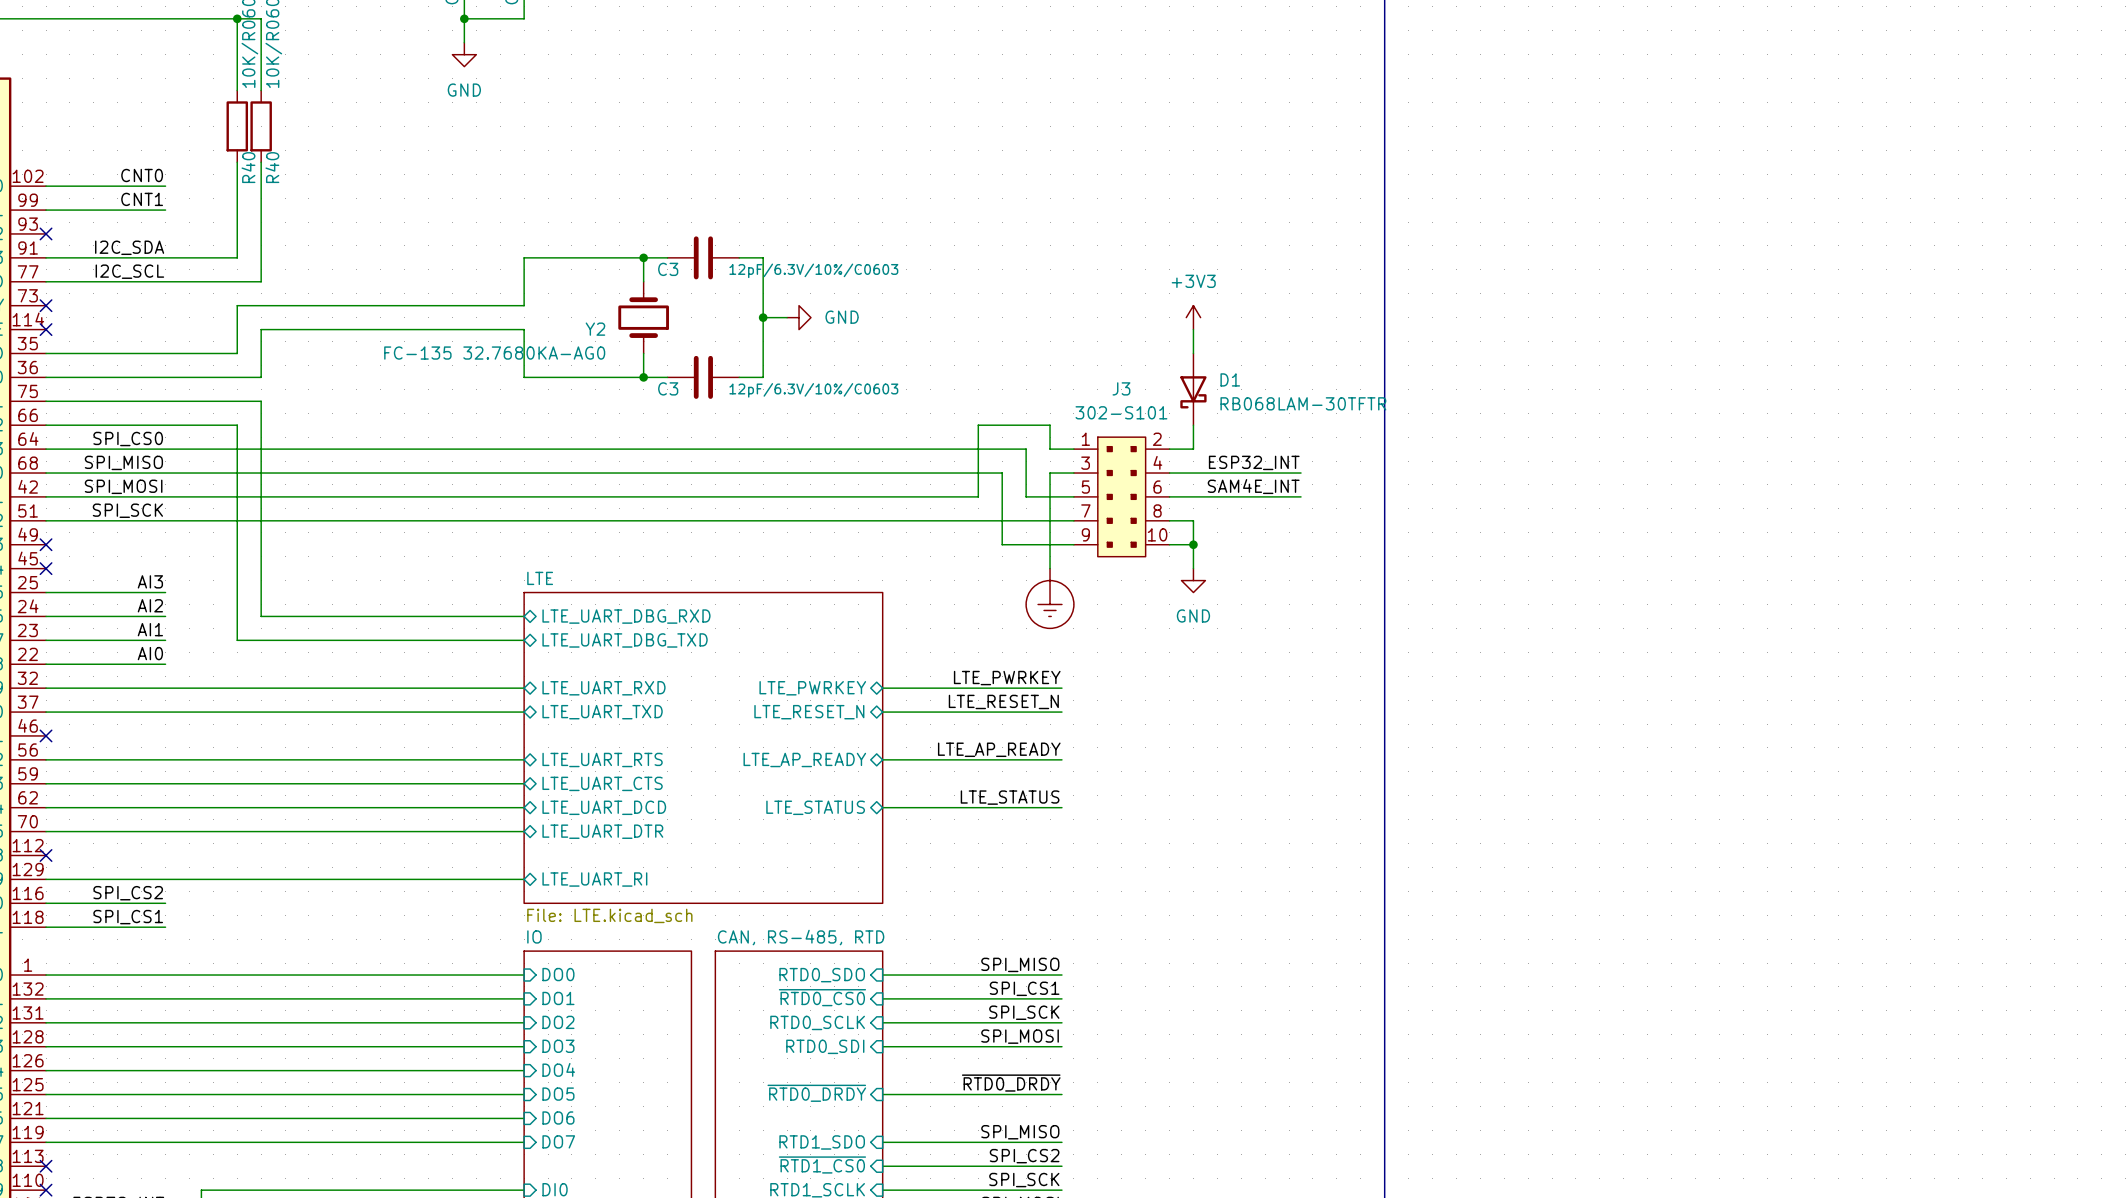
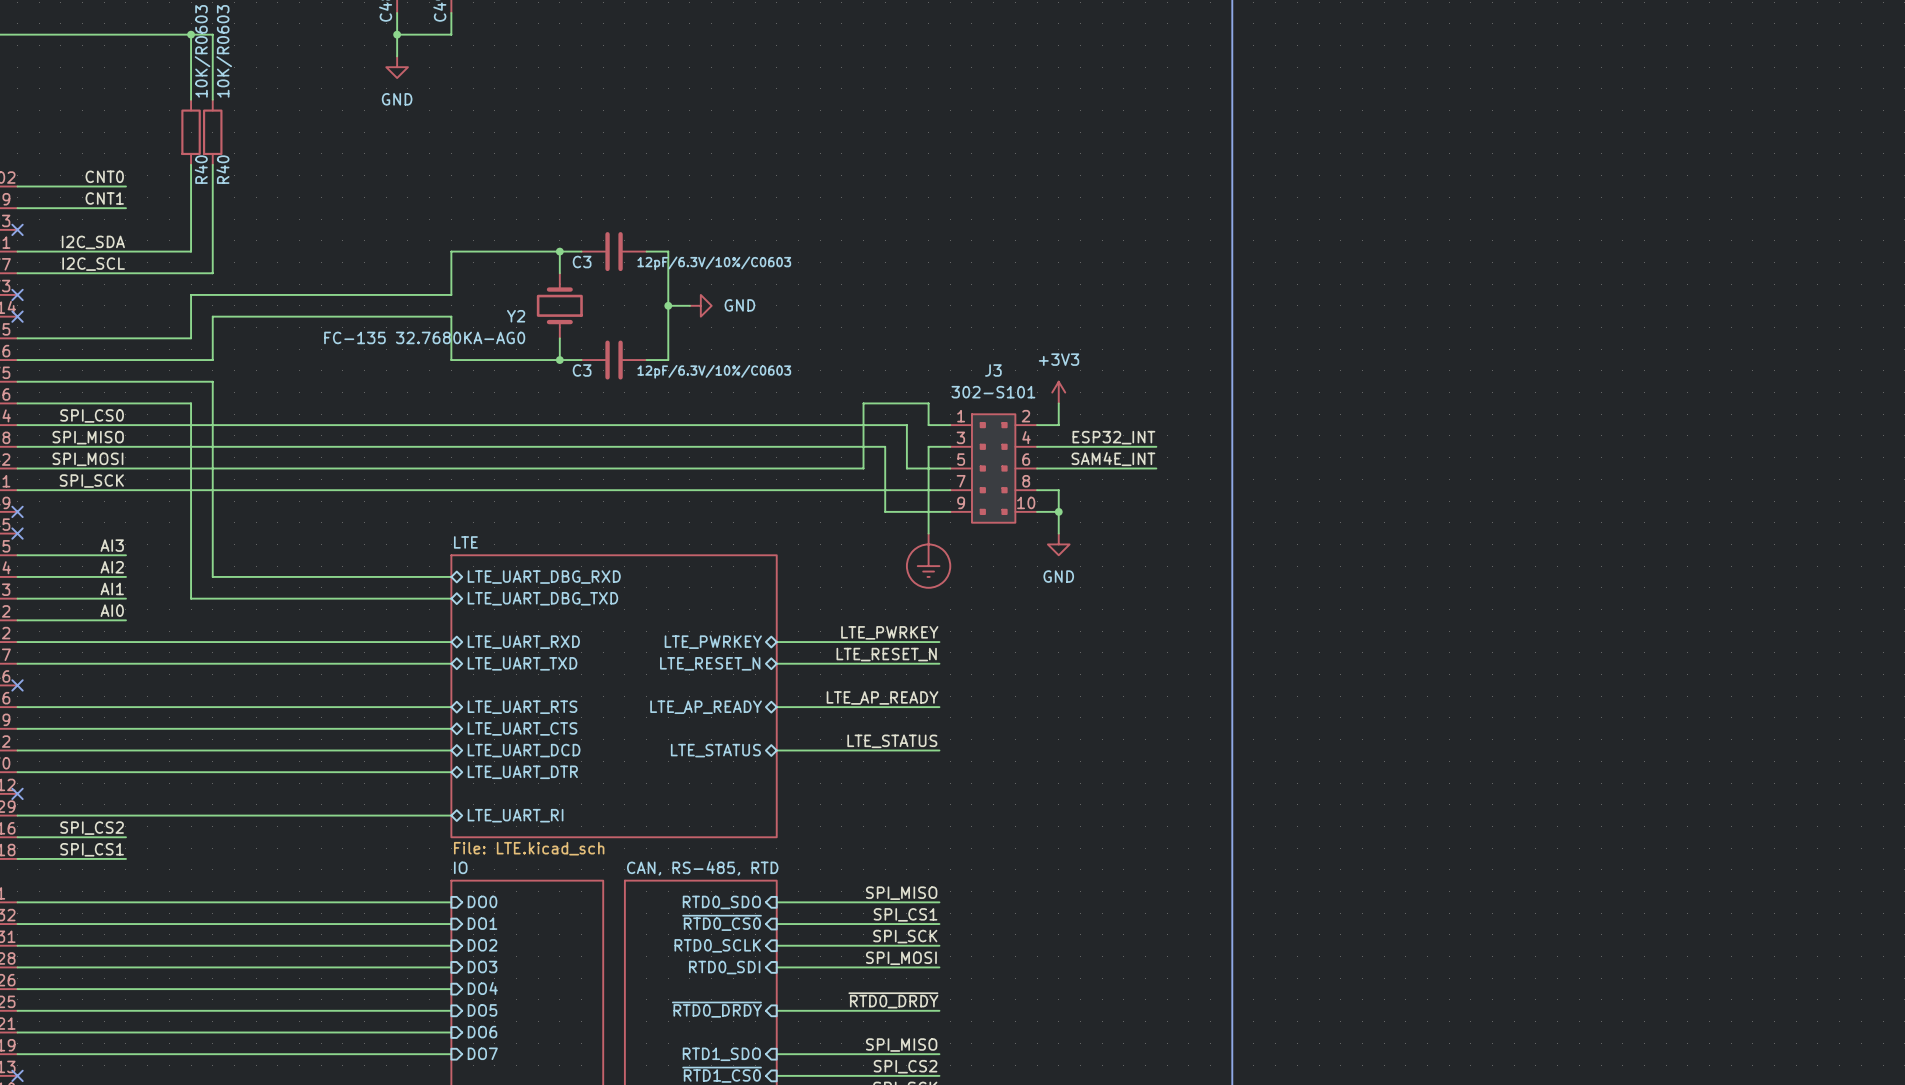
power symbol position: +3V3 (1193, 317) -> +3V3 (1058, 392)
wire: (1193, 329) (1193, 353) -> none
D1: RB068LAM-30TFTR (1193, 389) -> none

